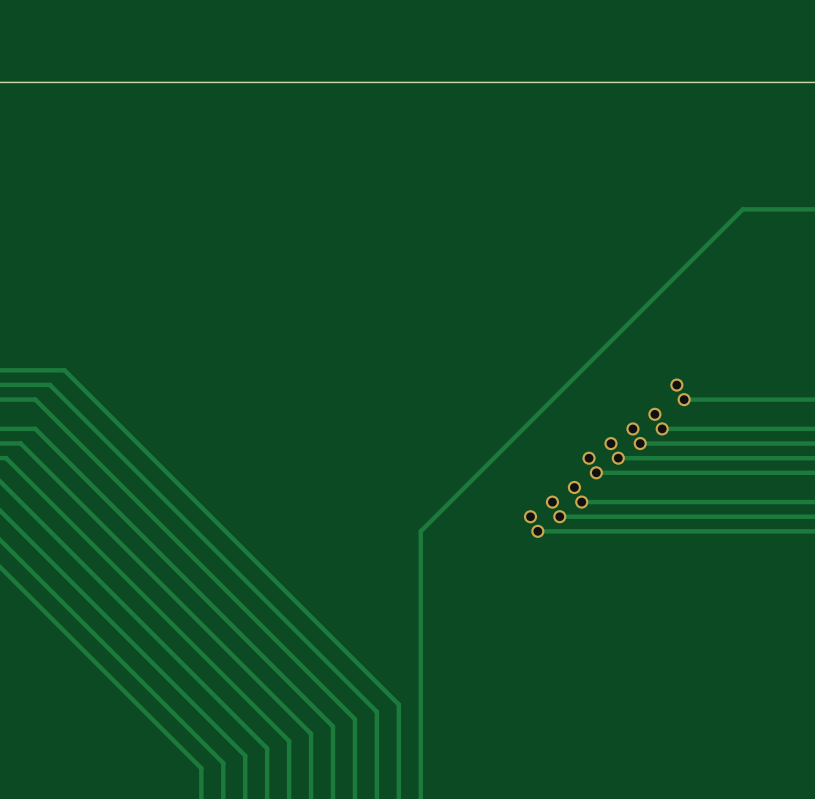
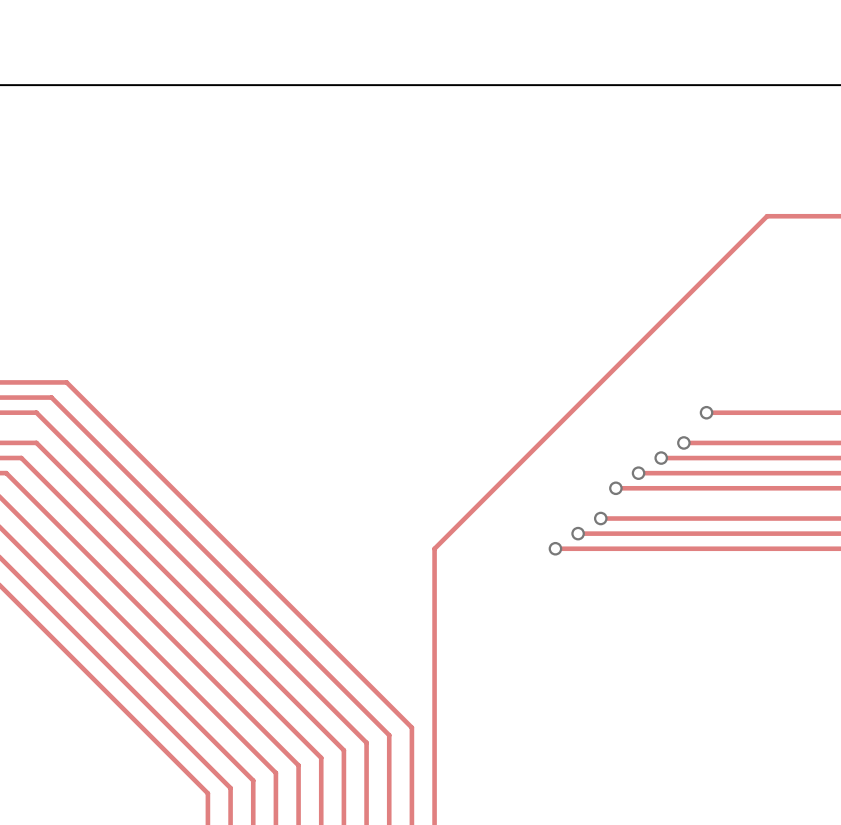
via: (676, 385) -> none
via: (654, 414) -> none
via: (632, 428) -> none
via: (610, 443) -> none
via: (589, 458) -> none
via: (574, 487) -> none
via: (552, 502) -> none
via: (530, 516) -> none

